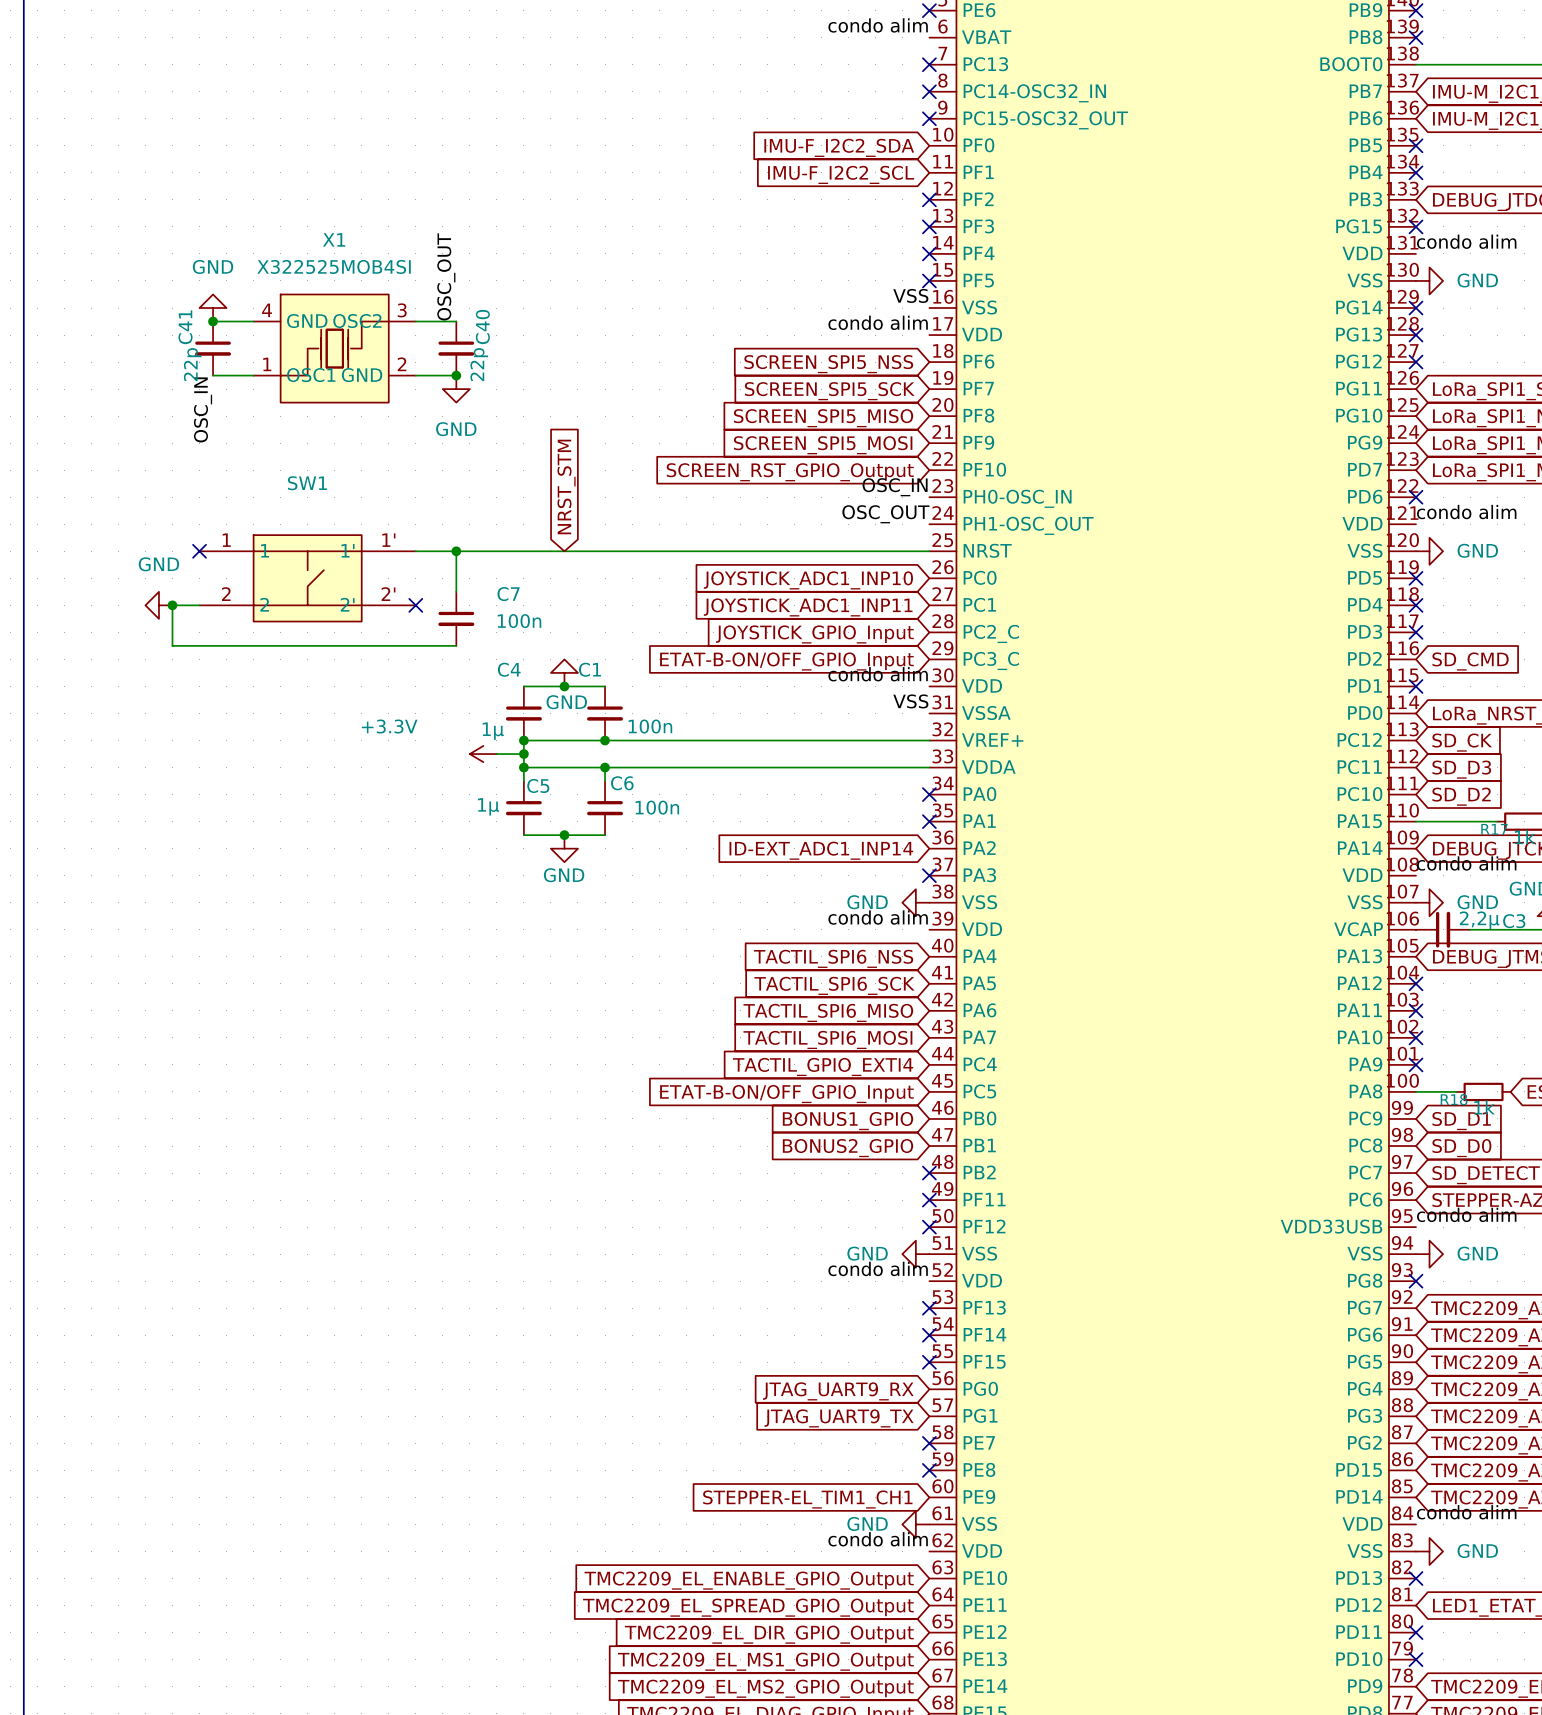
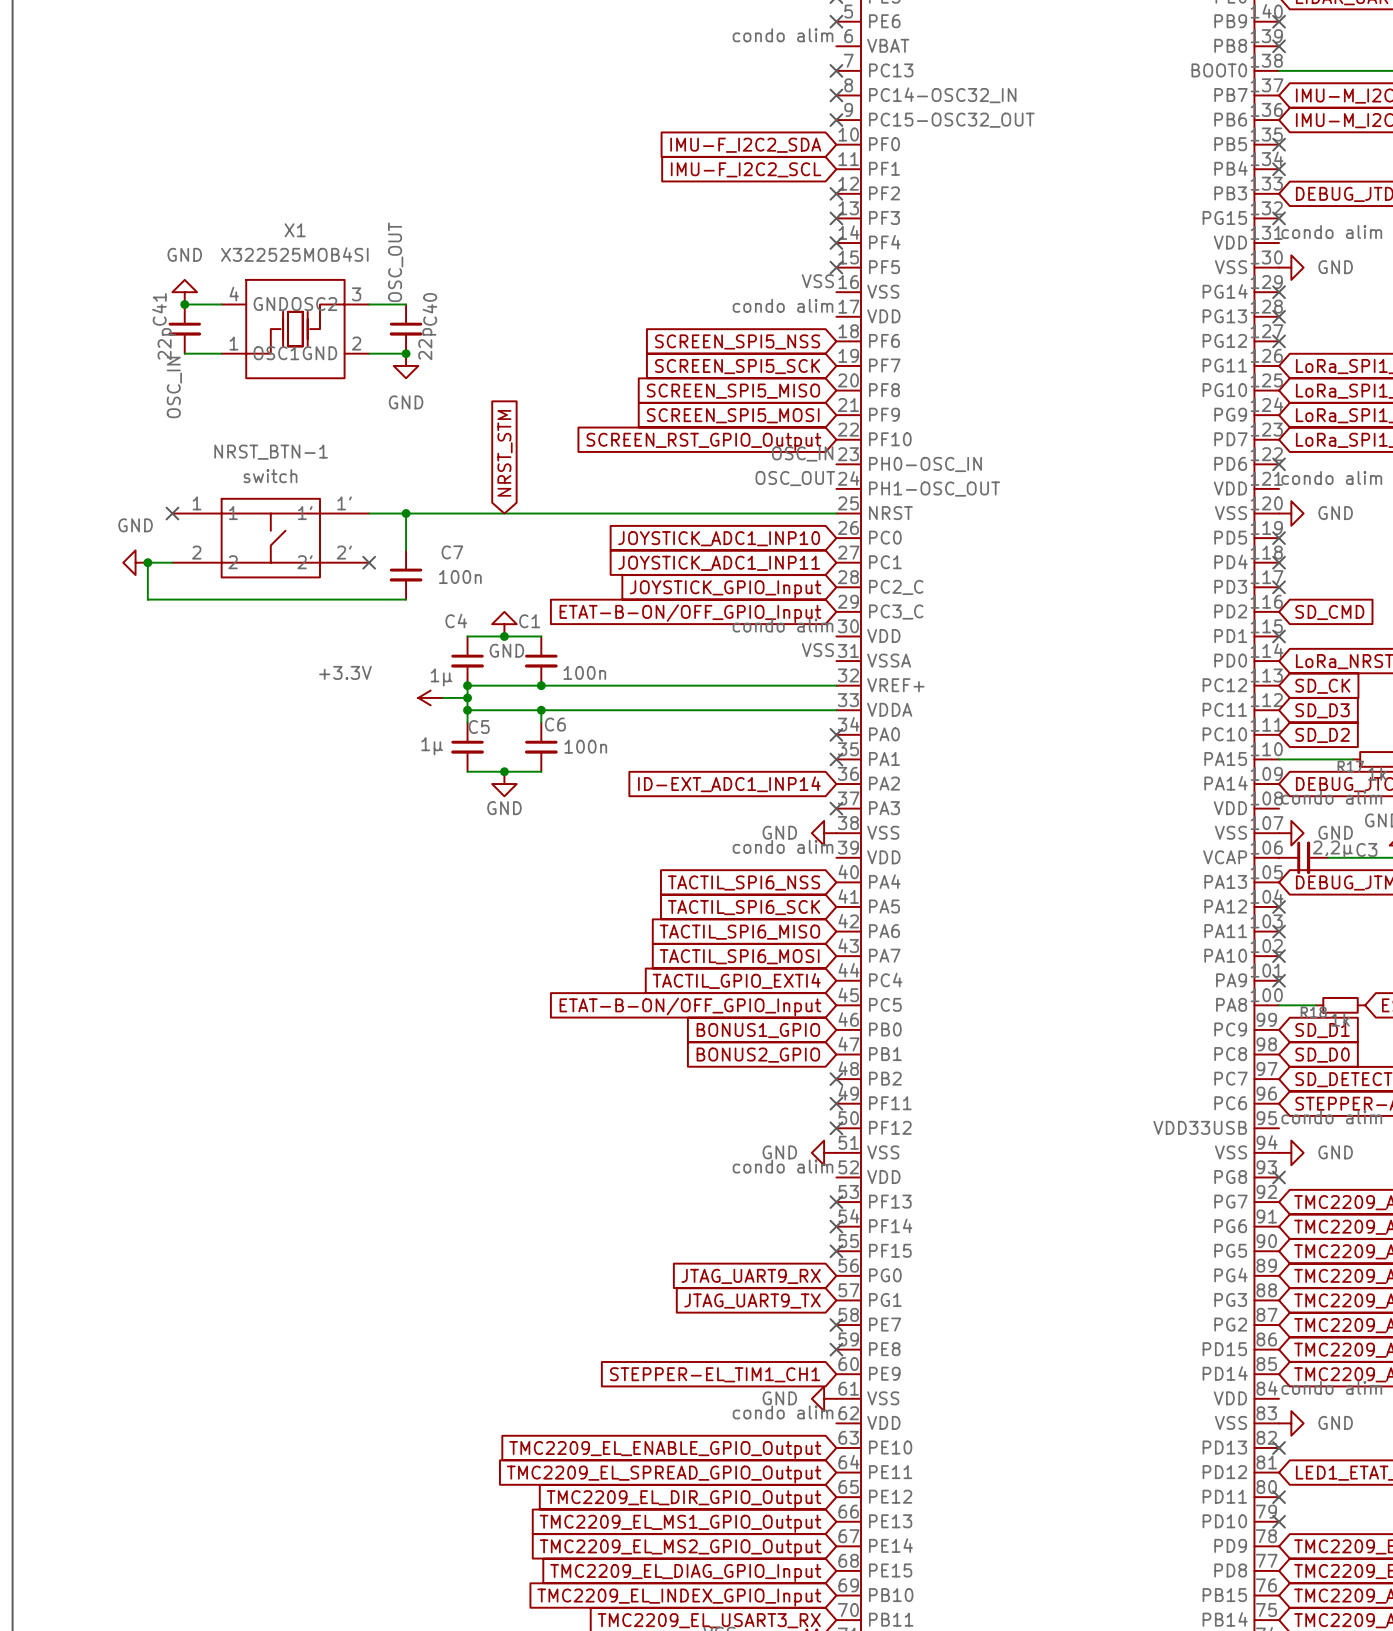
SW1 name: SW1 (307, 483) -> NRST_BTN-1 (271, 452)
SW1 value: none -> switch (270, 476)

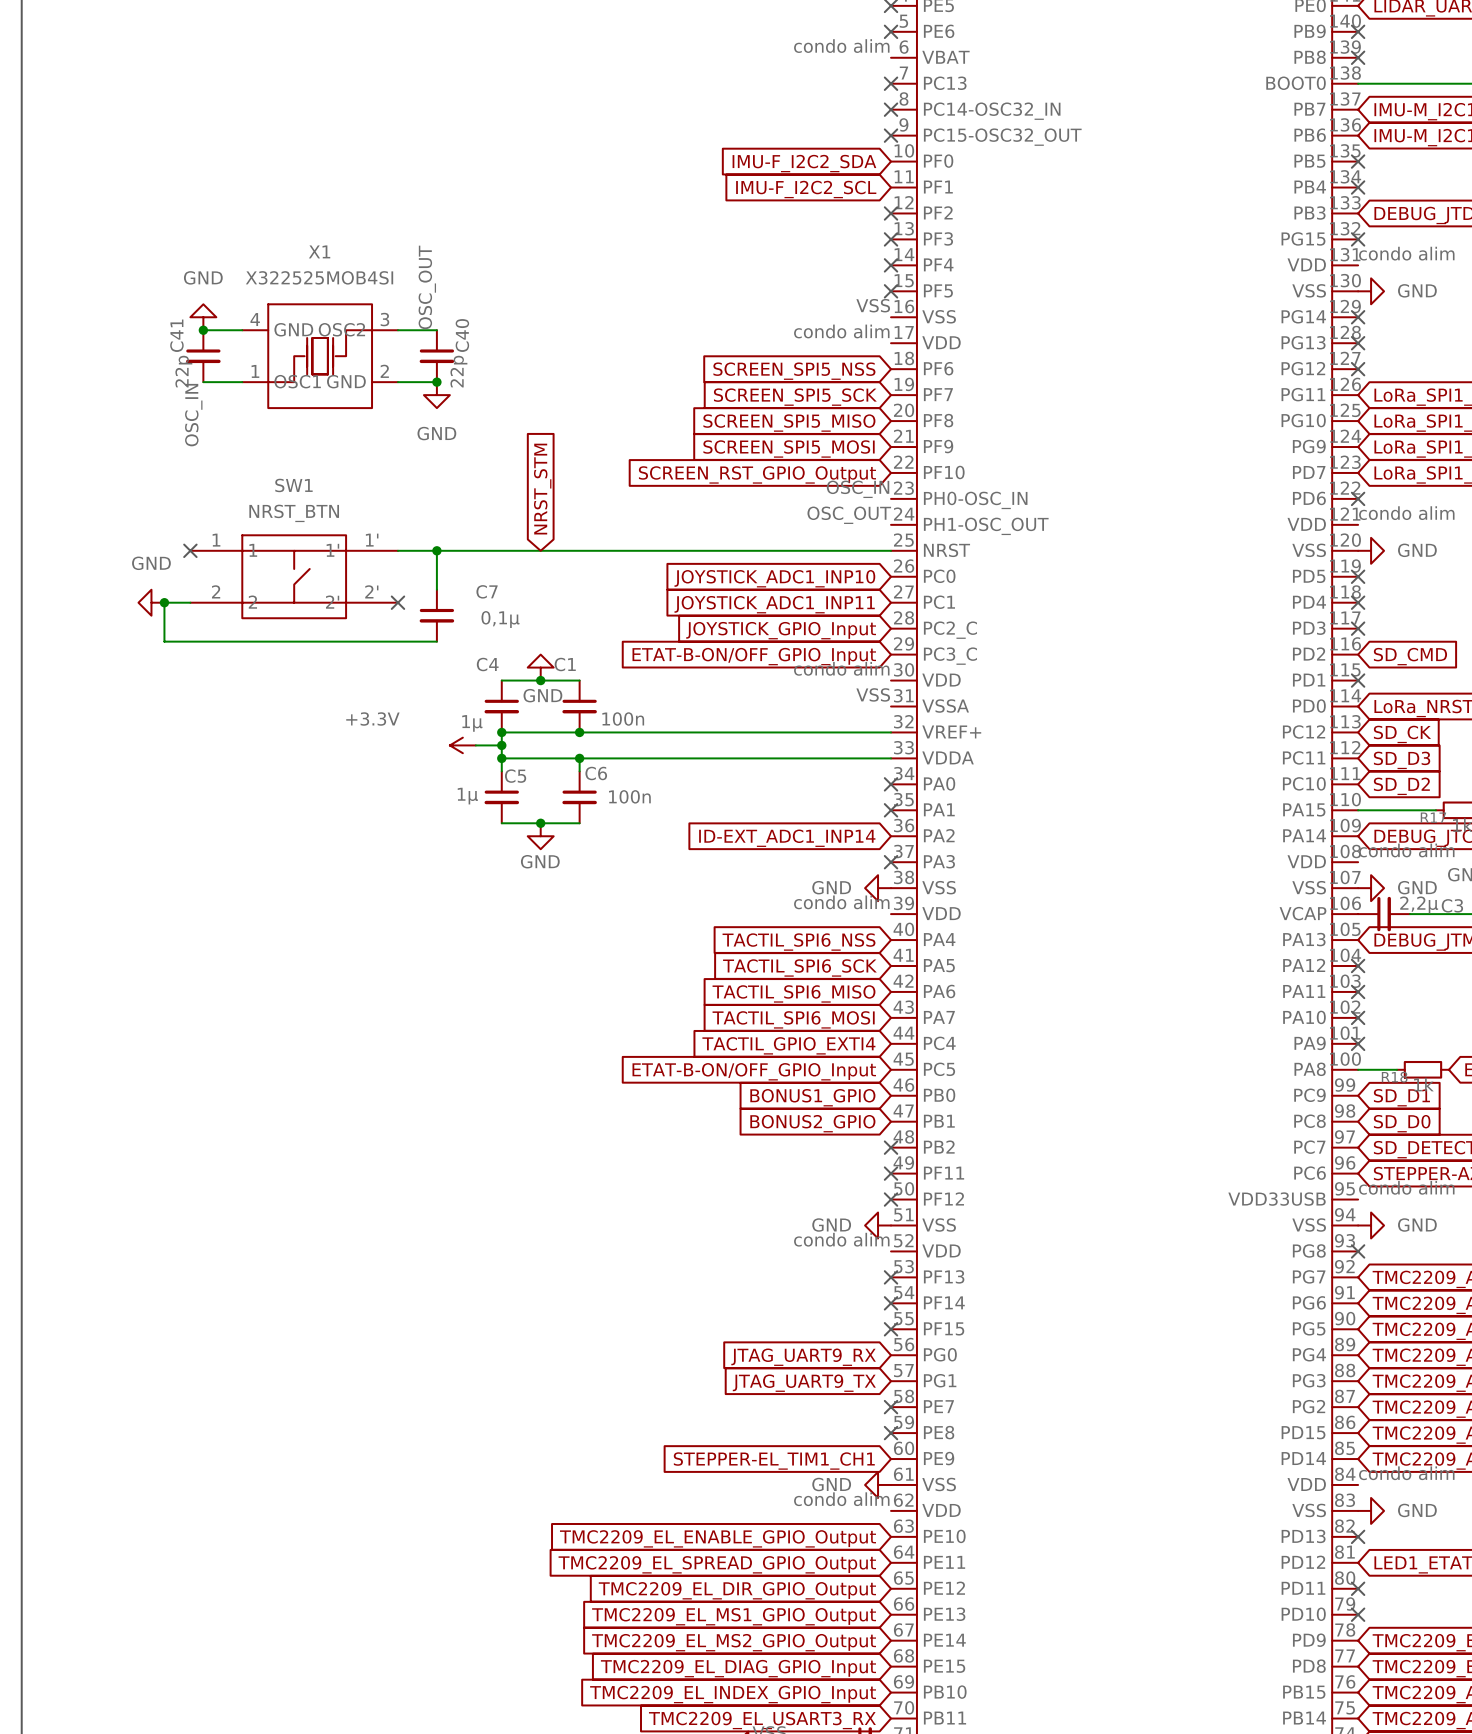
NRST_BTN-1 name: NRST_BTN-1 (271, 452) -> SW1 (293, 485)
NRST_BTN-1 value: switch (270, 476) -> NRST_BTN (294, 513)
C7 value: 100n (460, 577) -> 0,1µ (500, 619)

